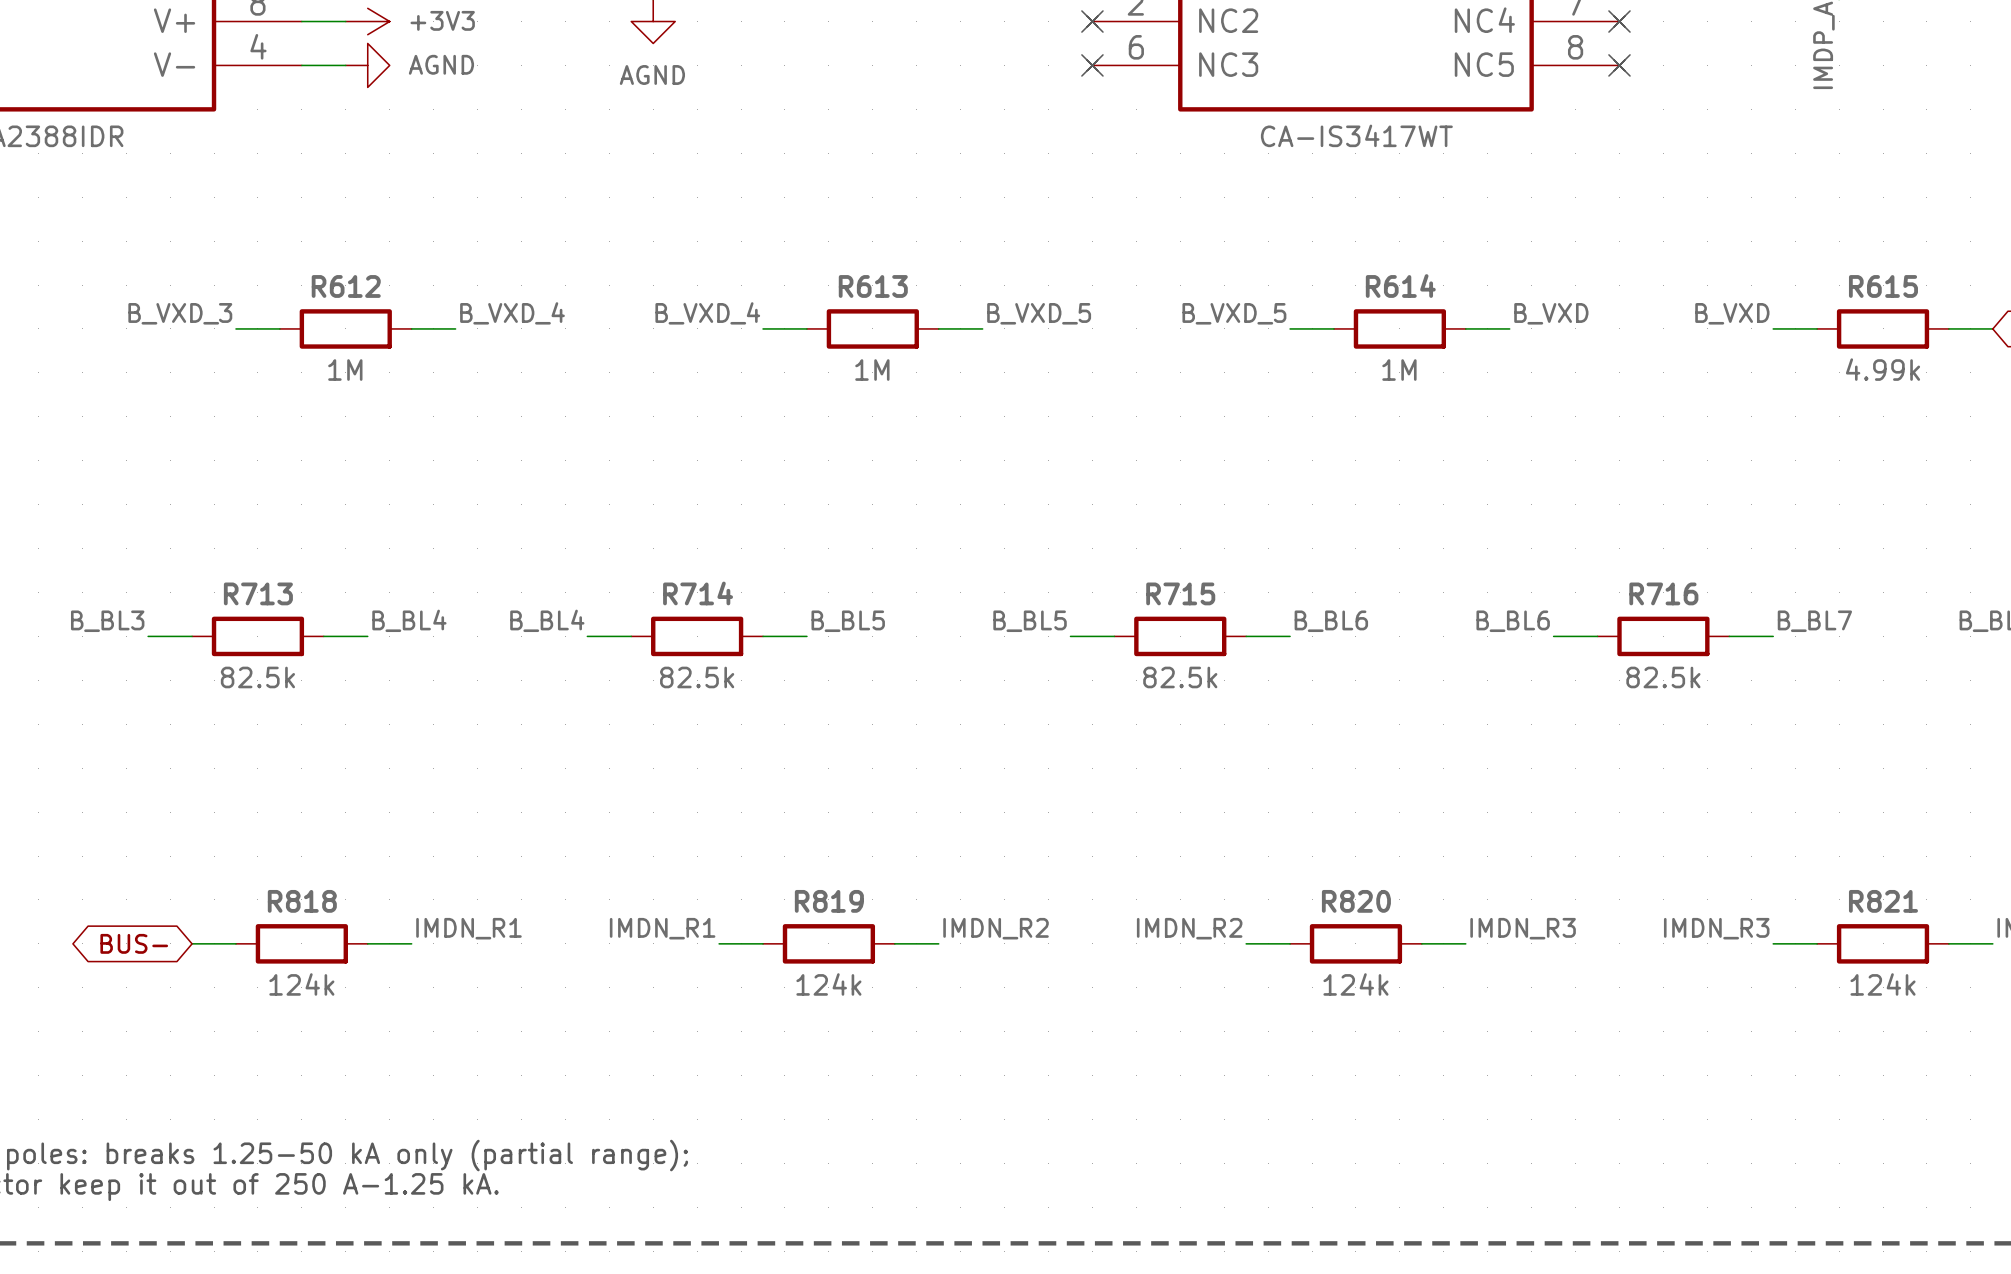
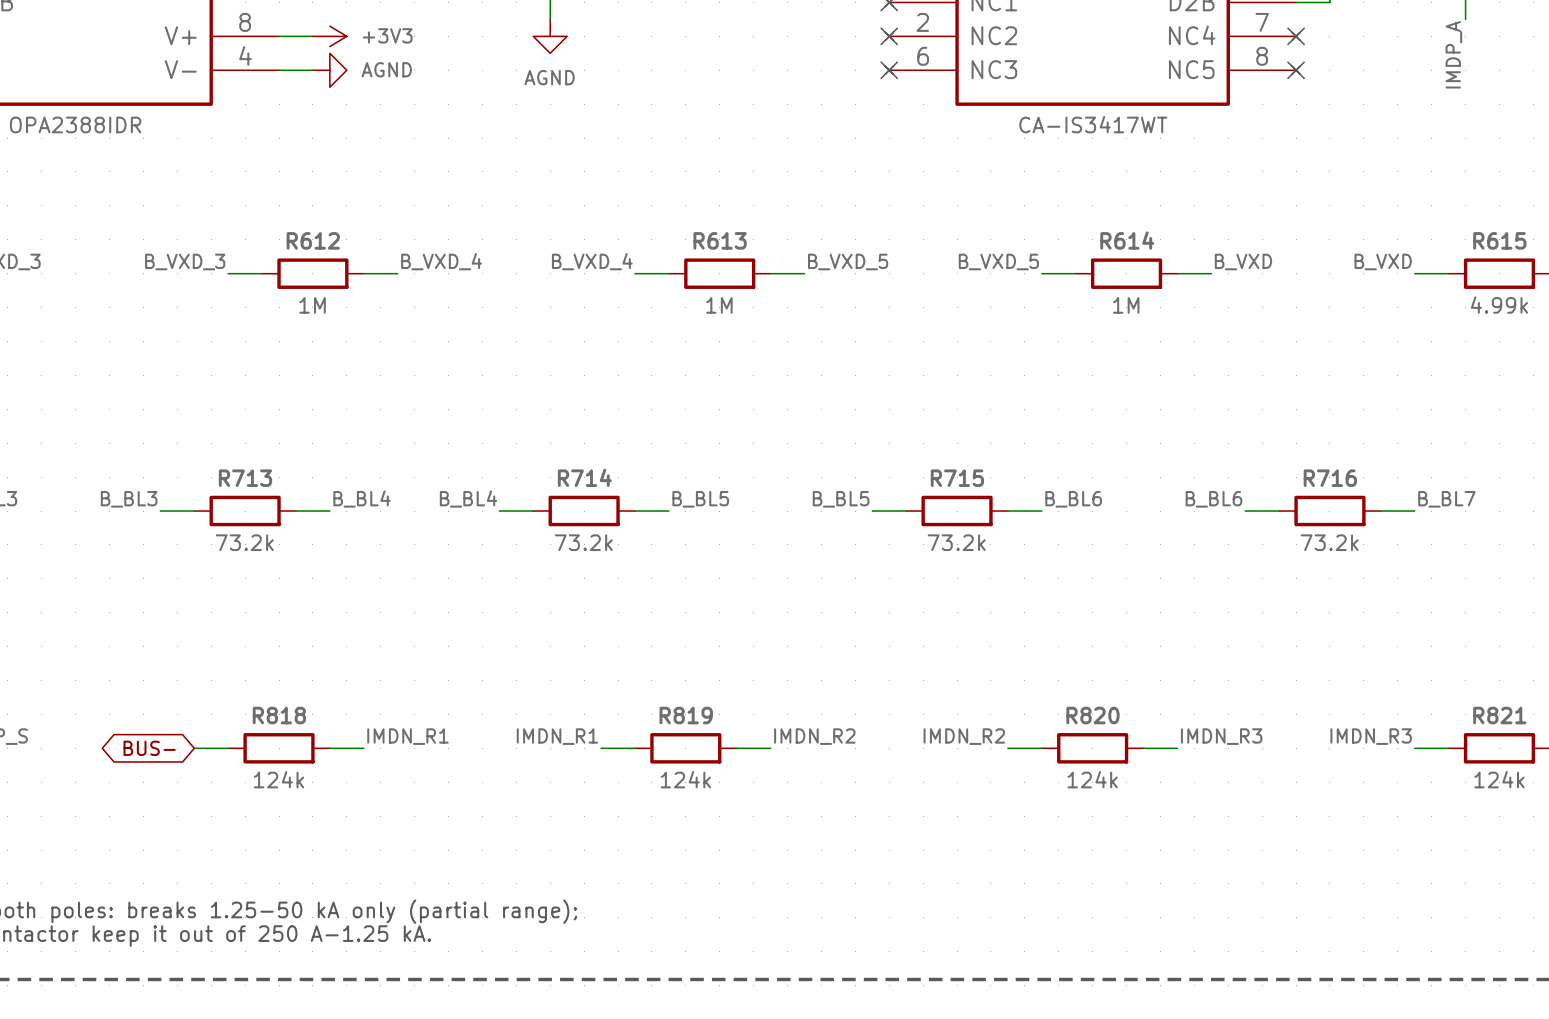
R713 value: 82.5k (257, 677) -> 73.2k (244, 542)
R714 value: 82.5k (697, 677) -> 73.2k (583, 542)
R715 value: 82.5k (1180, 677) -> 73.2k (956, 542)
R716 value: 82.5k (1663, 677) -> 73.2k (1329, 542)

